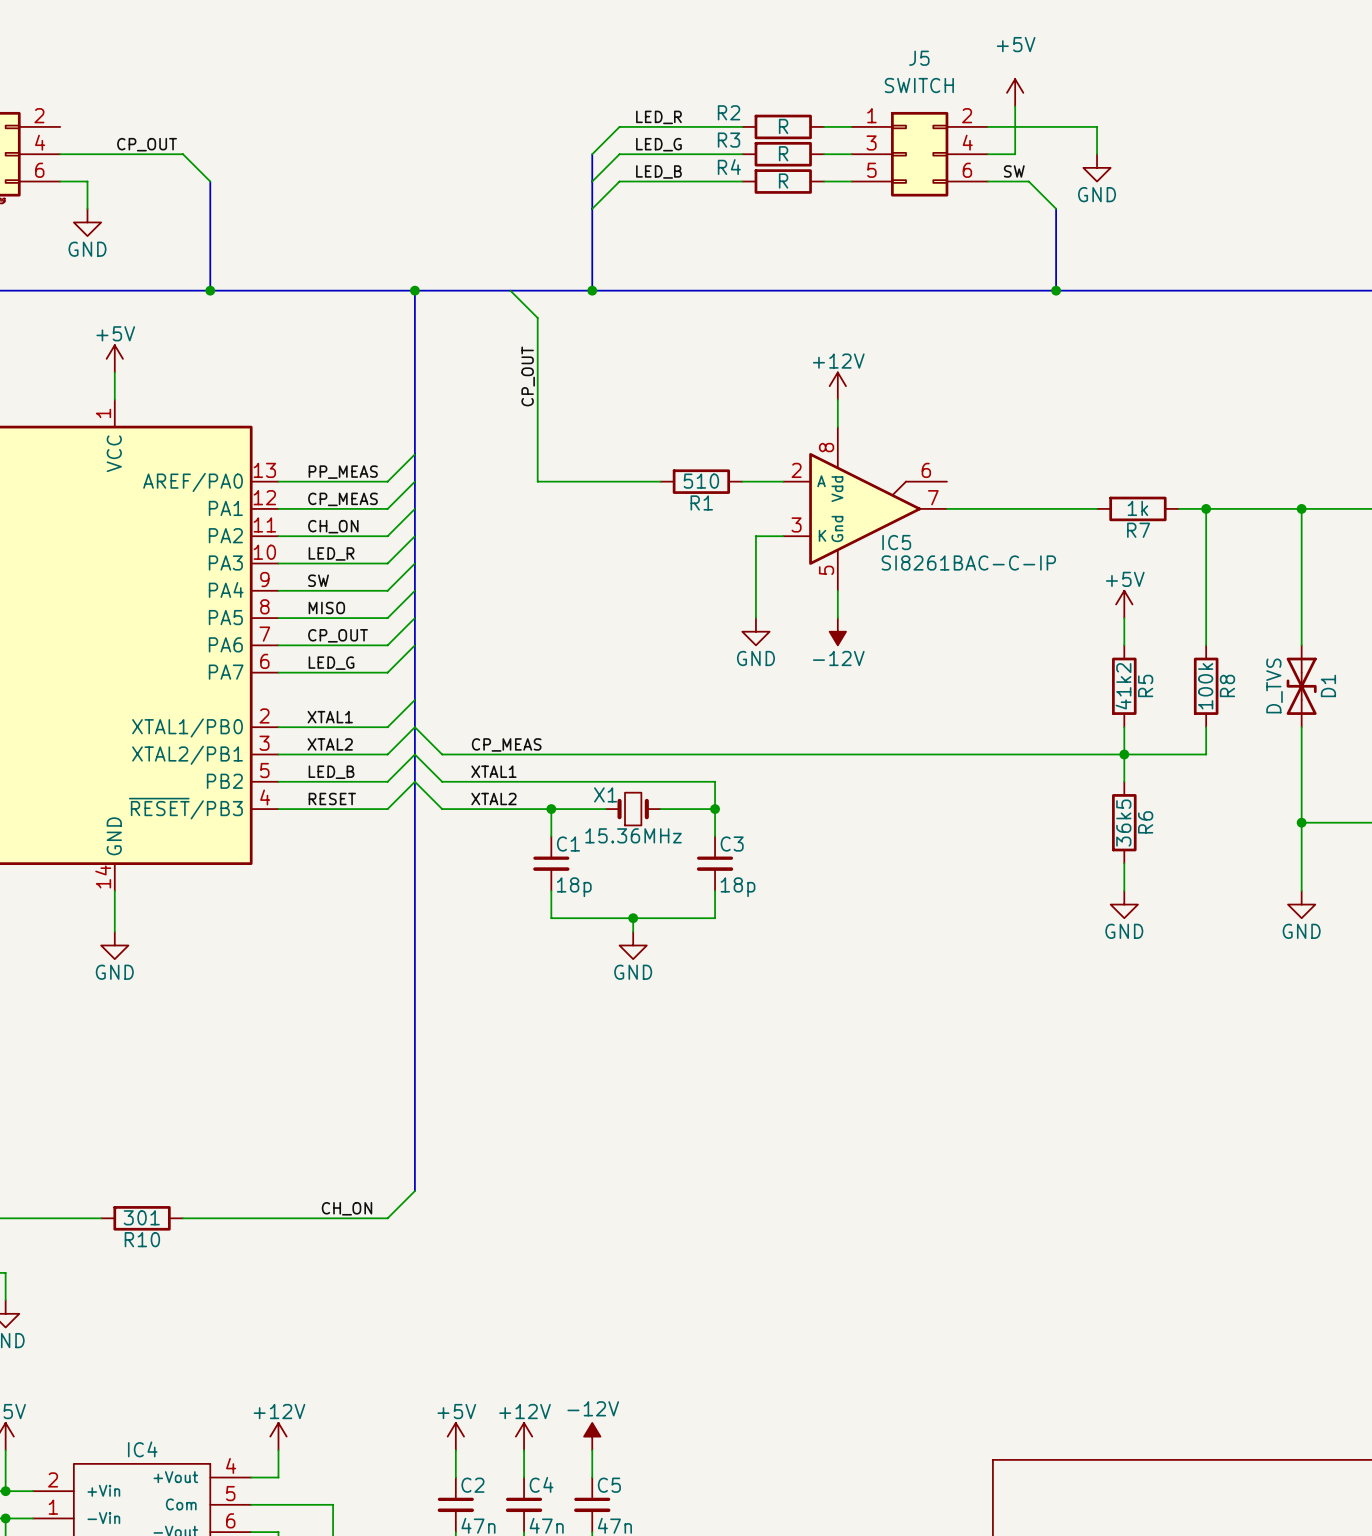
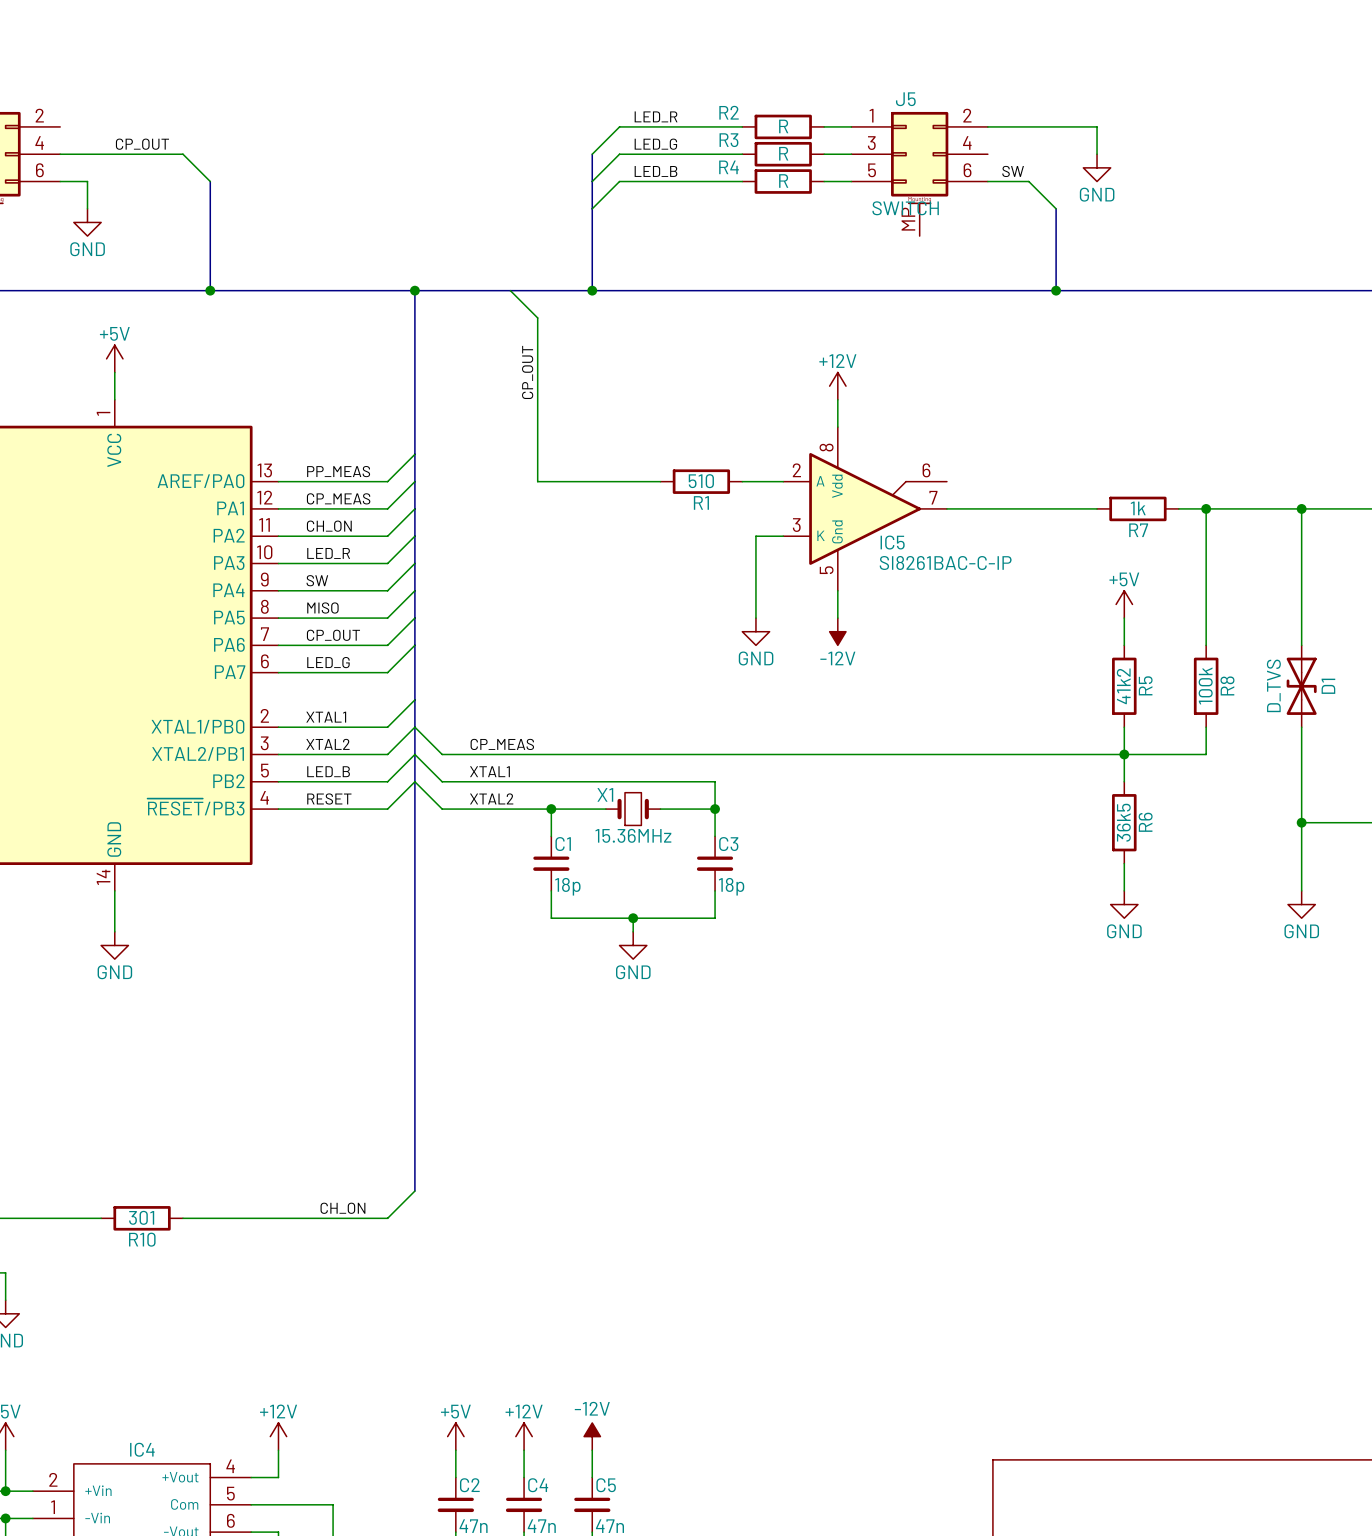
J5 name position: J5 (919, 58) -> J5 (905, 99)
J5 value position: SWITCH (919, 85) -> SWITCH (905, 208)
power symbol: +5V (1015, 92) -> none
wire: (1015, 106) (1015, 154) (987, 154) -> none
J5 symbol: [851, 111, 988, 197] -> [851, 111, 988, 237]

